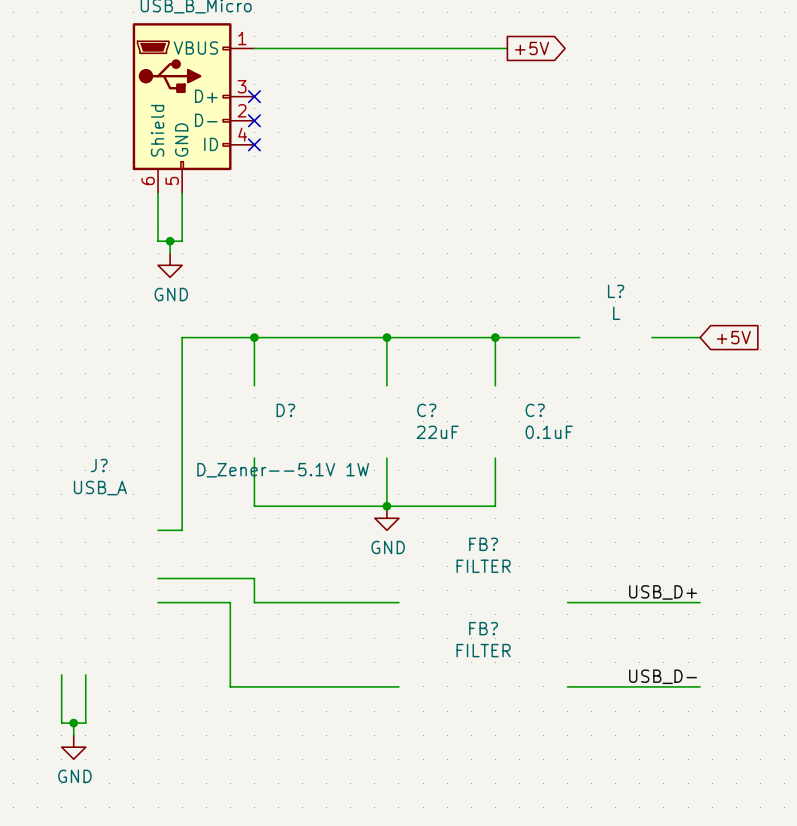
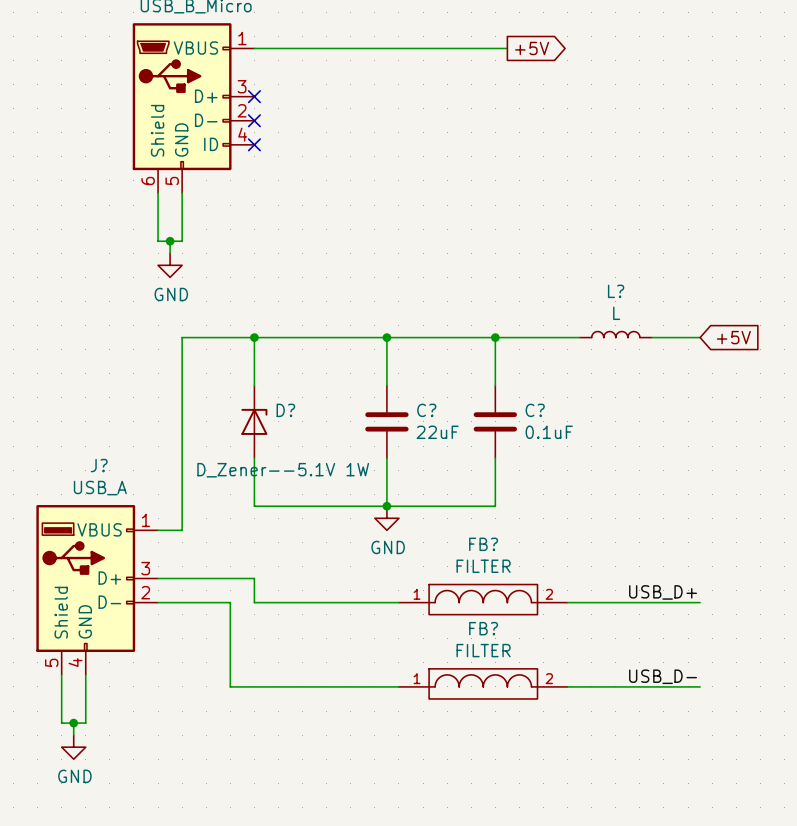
L?: none -> L (615, 334)
D?: none -> D_Zener--5.1V 1W (254, 421)
C?: none -> 22uF (386, 421)
C?: none -> 0.1uF (495, 421)
J?: none -> USB_A (97, 589)
FB?: none -> FILTER (483, 599)
FB?: none -> FILTER (483, 683)

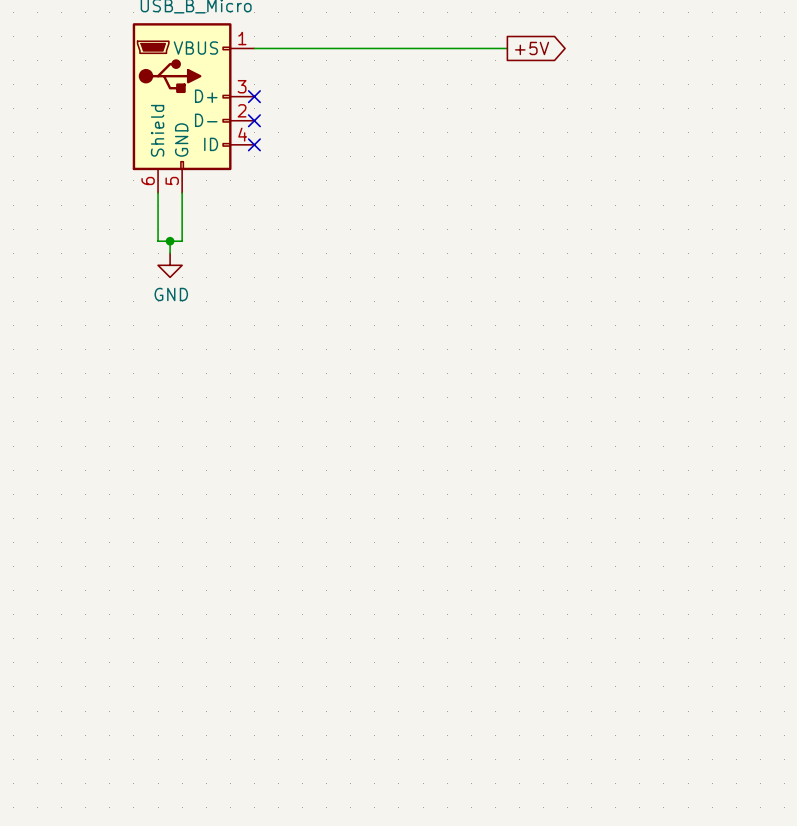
L?: L (615, 334) -> none
wire: (254, 337) (254, 385) -> none
junction: (254, 337) -> none
wire: (386, 337) (386, 385) -> none
junction: (386, 337) -> none
wire: (495, 337) (495, 385) -> none
junction: (495, 337) -> none
wire: (579, 337) (182, 337) (182, 530) (158, 530) -> none
wire: (651, 337) (700, 337) -> none
global label: +5V (733, 337) -> none
D?: D_Zener--5.1V 1W (254, 421) -> none
C?: 22uF (386, 421) -> none
C?: 0.1uF (495, 421) -> none
wire: (254, 458) (254, 506) (495, 506) (495, 458) -> none
wire: (386, 458) (386, 506) -> none
junction: (386, 506) -> none
power symbol: GND (386, 518) -> none
wire: (158, 578) (254, 578) (254, 602) (398, 602) -> none
J?: USB_A (97, 589) -> none
label: USB_D+ (663, 592) -> none
FB?: FILTER (483, 599) -> none
wire: (158, 602) (230, 602) (230, 686) (398, 686) -> none
wire: (567, 602) (700, 602) -> none
wire: (61, 674) (61, 723) (85, 723) (85, 674) -> none
label: USB_D- (663, 676) -> none
FB?: FILTER (483, 683) -> none
wire: (567, 686) (700, 686) -> none
wire: (73, 723) (73, 735) -> none
junction: (73, 723) -> none
power symbol: GND (73, 747) -> none

